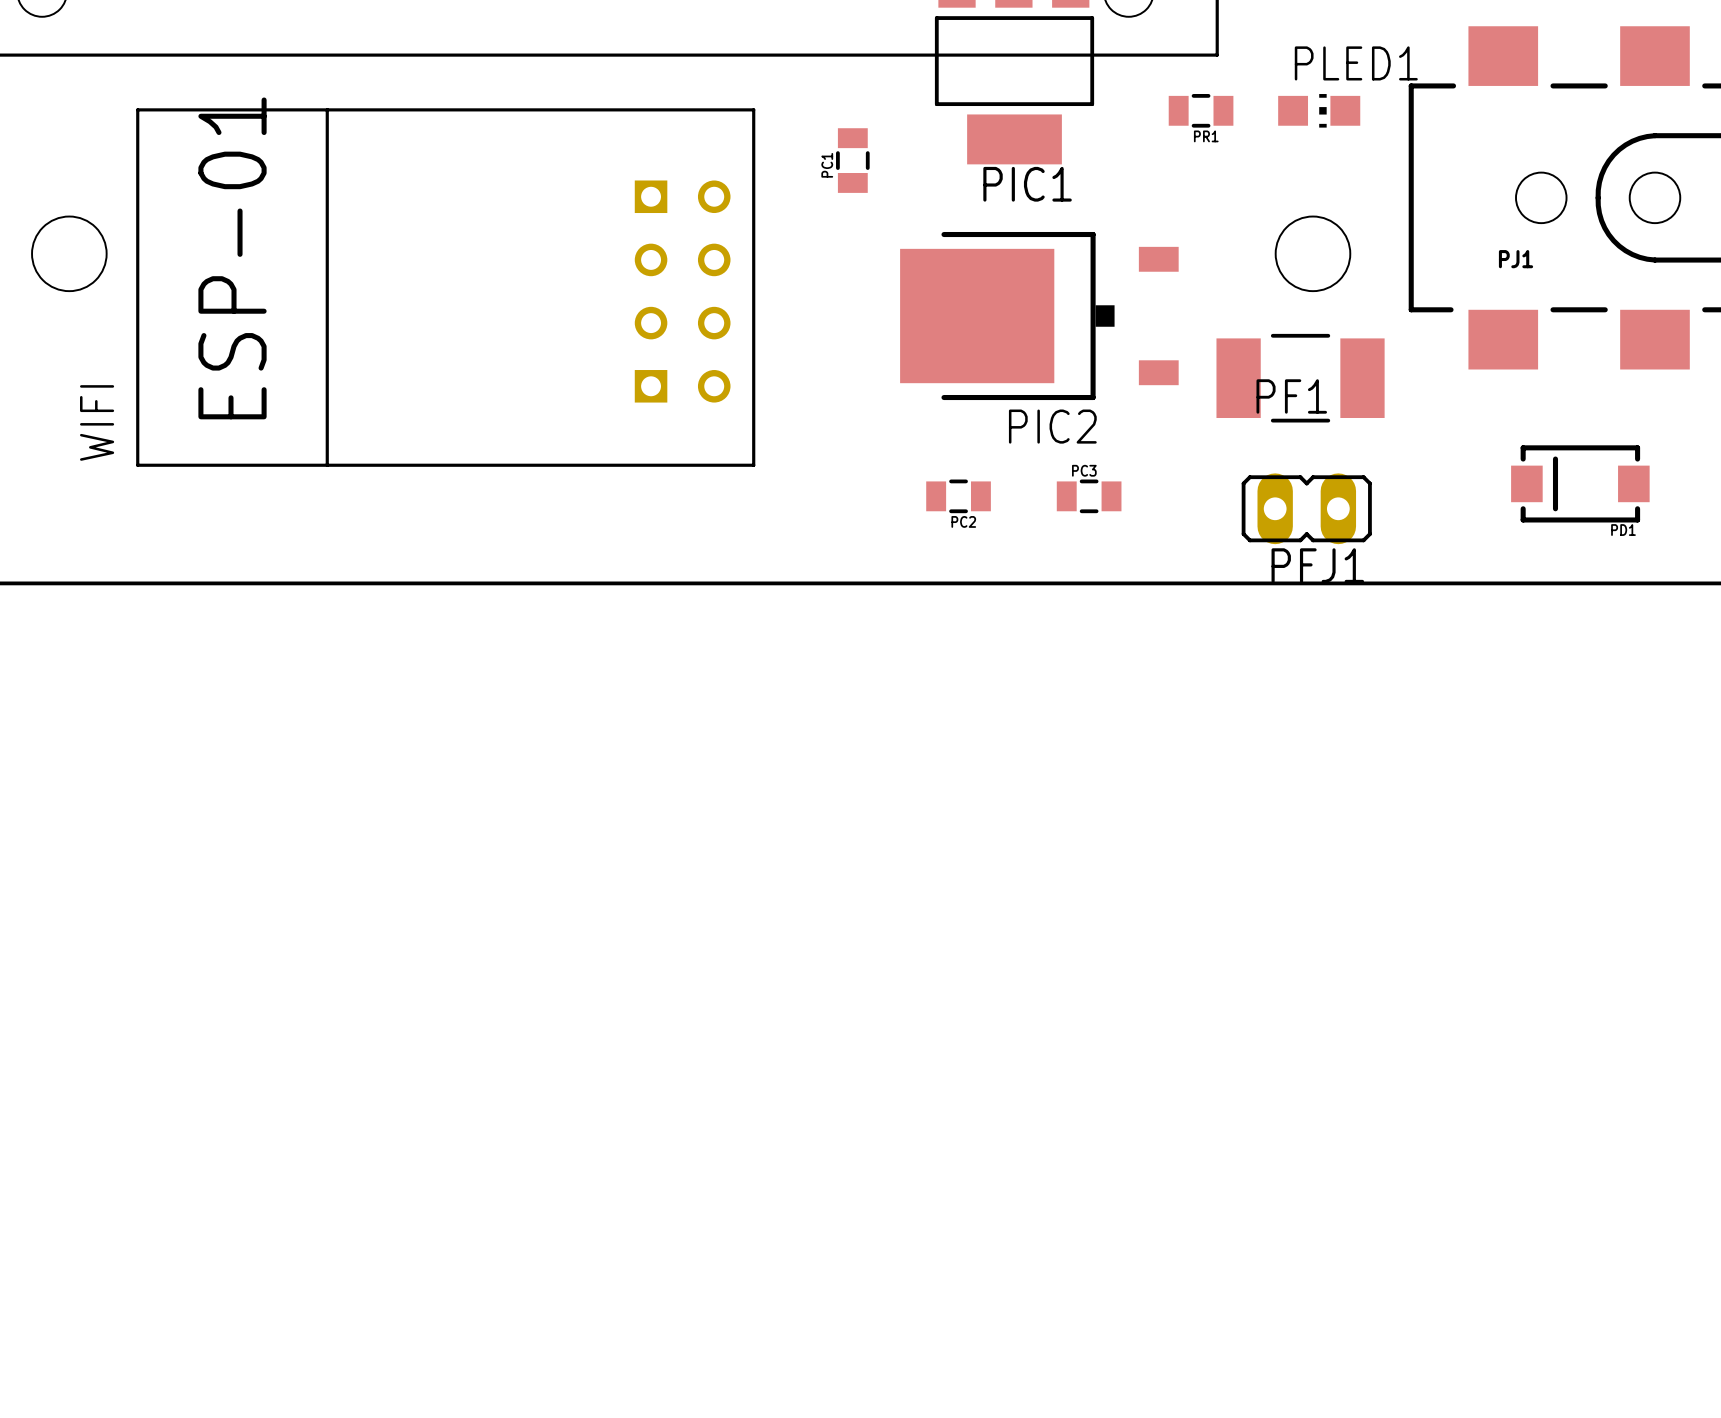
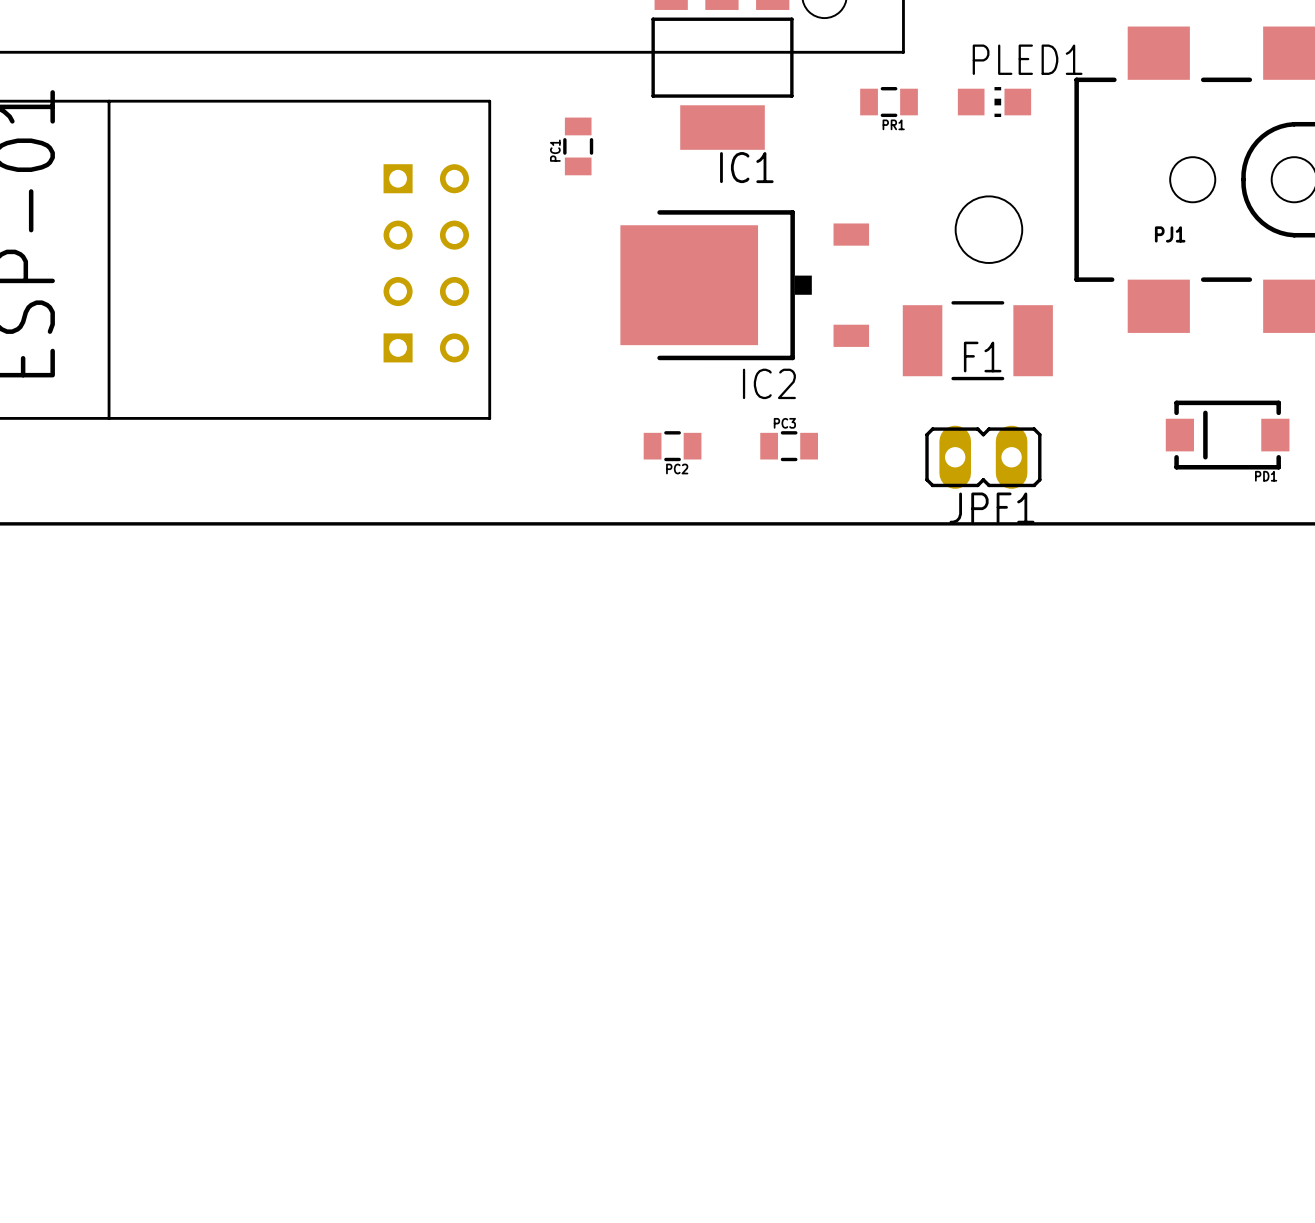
PIC1 name: PIC1 (1027, 184) -> IC1 (746, 167)
PF1 name: PF1 (1291, 396) -> F1 (982, 357)
PIC2 name: PIC2 (1052, 426) -> IC2 (769, 383)
PFJ1 name: PFJ1 (1317, 565) -> JPF1 (992, 508)

